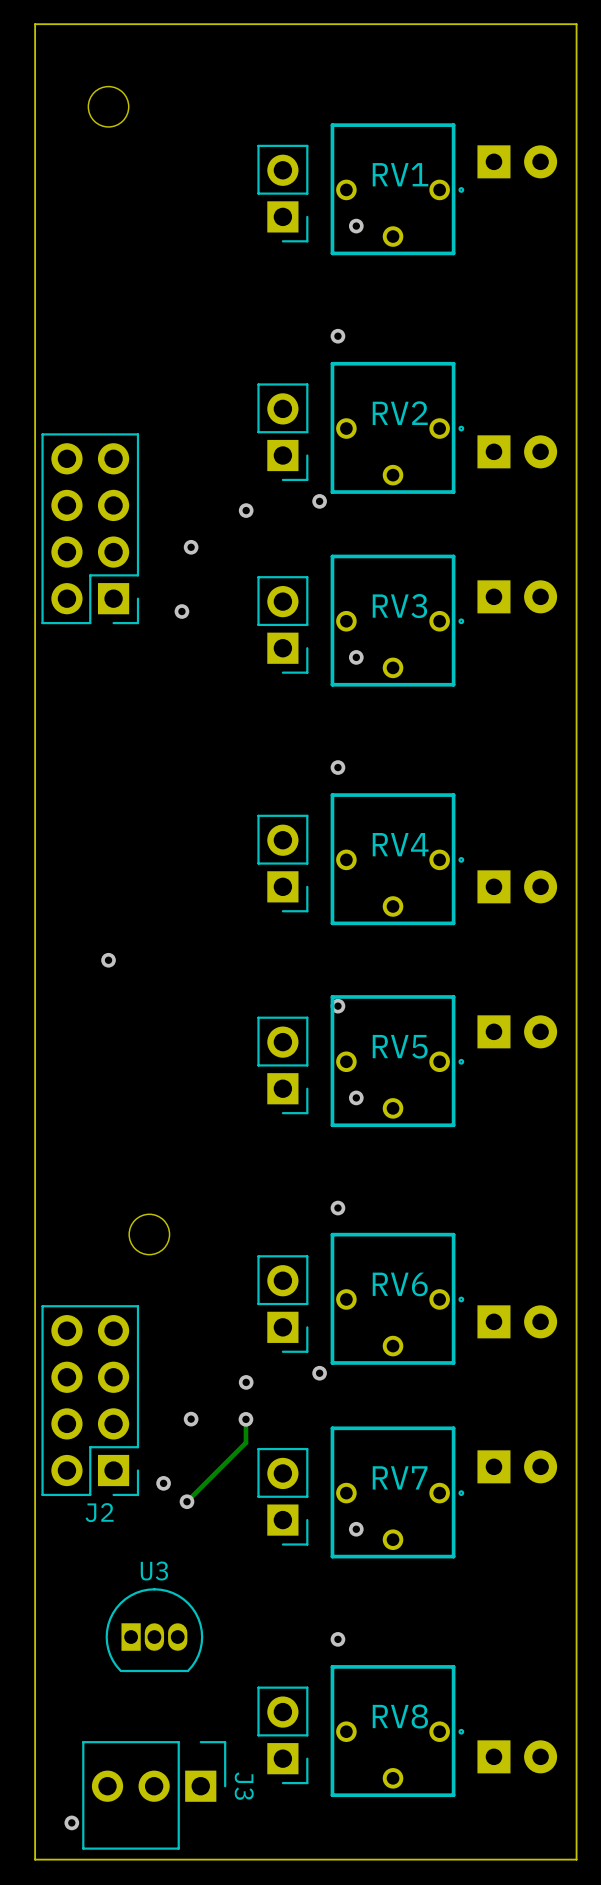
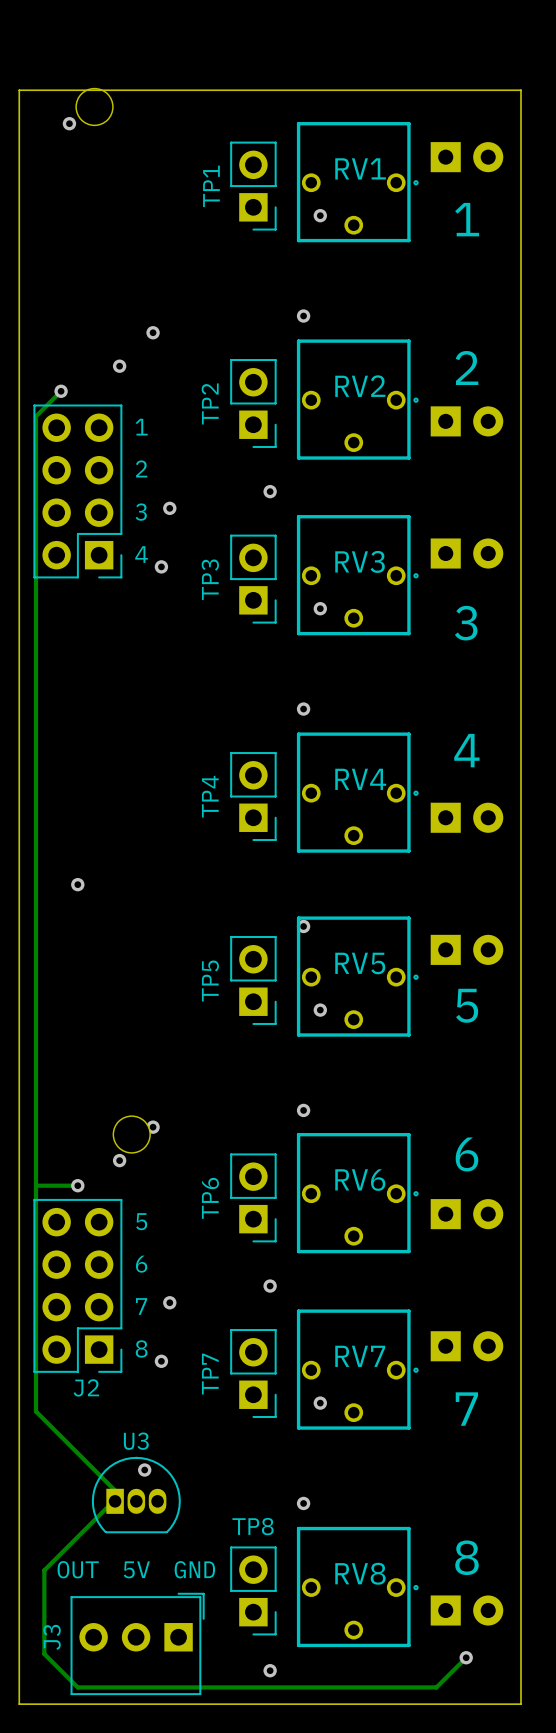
board edge: (576, 88) (576, 24) (35, 24) (35, 1859) -> (521, 90) (19, 90) (19, 1704) (27, 1704)
via: none -> (69, 123)
TP1 name: none -> TP1 (211, 186)
text: none -> 1 (467, 219)
via: none -> (153, 332)
via: none -> (119, 366)
text: none -> 2 (467, 368)
track: none -> (61, 391) (35, 416) (35, 1411) (115, 1490) (115, 1501) (44, 1570) (44, 1653) (77, 1687) (436, 1687) (466, 1657)
via: none -> (61, 391)
TP2 name: none -> TP2 (210, 403)
text: none -> 1 (141, 427)
via: (319, 501) -> none
text: none -> 2 (141, 468)
via: (246, 510) -> none
via: none -> (270, 491)
text: none -> 3 (141, 512)
text: none -> 4 (141, 554)
TP3 name: none -> TP3 (210, 579)
text: none -> 3 (466, 623)
text: none -> 4 (466, 750)
TP4 name: none -> TP4 (210, 796)
via position: (108, 960) -> (77, 884)
TP5 name: none -> TP5 (210, 980)
text: none -> 5 (467, 1005)
via: none -> (153, 1127)
text: none -> 6 (466, 1154)
via: none -> (119, 1160)
track: none -> (77, 1185) (35, 1185)
via: none -> (77, 1185)
TP6 name: none -> TP6 (210, 1198)
text: none -> 5 (141, 1221)
via: (319, 1373) -> none
text: none -> 6 (141, 1264)
via: (246, 1382) -> none
via: none -> (270, 1286)
track: (245, 1419) (245, 1442) (187, 1501) -> none
via: (245, 1419) -> none
text: none -> 7 (141, 1306)
text: none -> 8 (141, 1348)
via: (163, 1483) -> none
via: none -> (161, 1361)
TP7 name: none -> TP7 (210, 1374)
via: (187, 1501) -> none
text: none -> 7 (466, 1409)
via: none -> (144, 1470)
TP8 name: none -> TP8 (253, 1526)
text: none -> 8 (466, 1557)
text: none -> OUT (78, 1569)
text: none -> 5V (136, 1569)
text: none -> GND (194, 1569)
J3 footprint: [82, 1741, 227, 1850] -> [70, 1592, 205, 1696]
J3 name position: J3 (244, 1786) -> J3 (52, 1637)
via: none -> (466, 1657)
via: (71, 1822) -> none
via: none -> (270, 1670)

